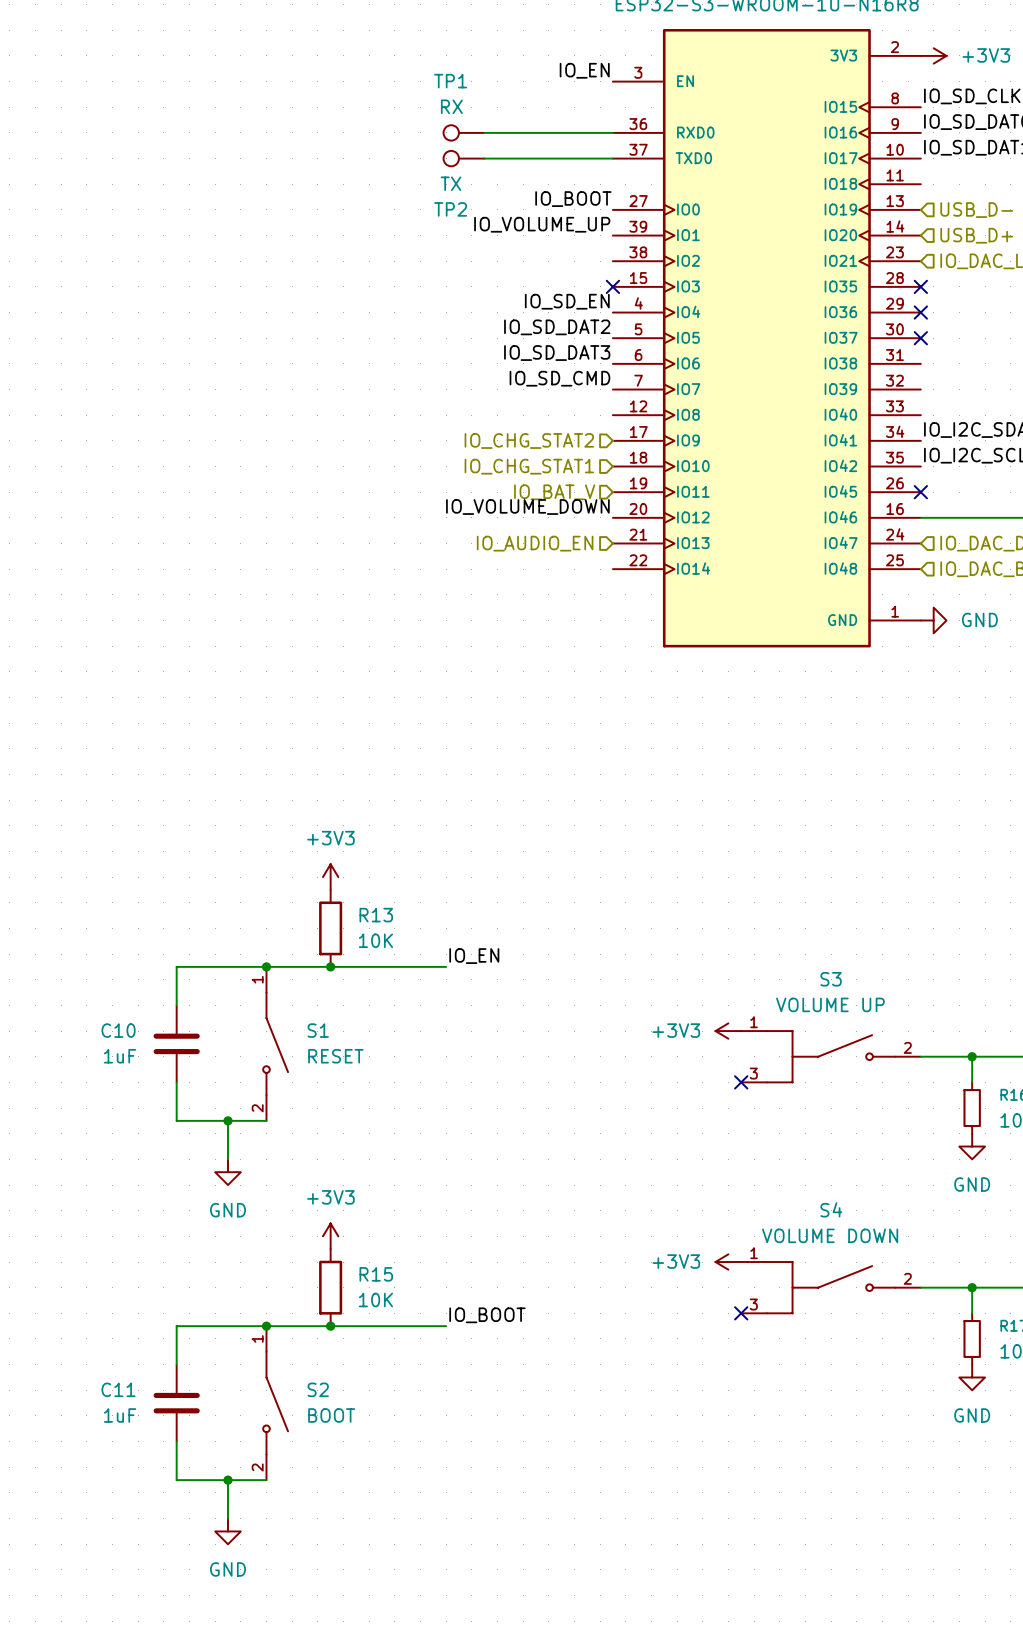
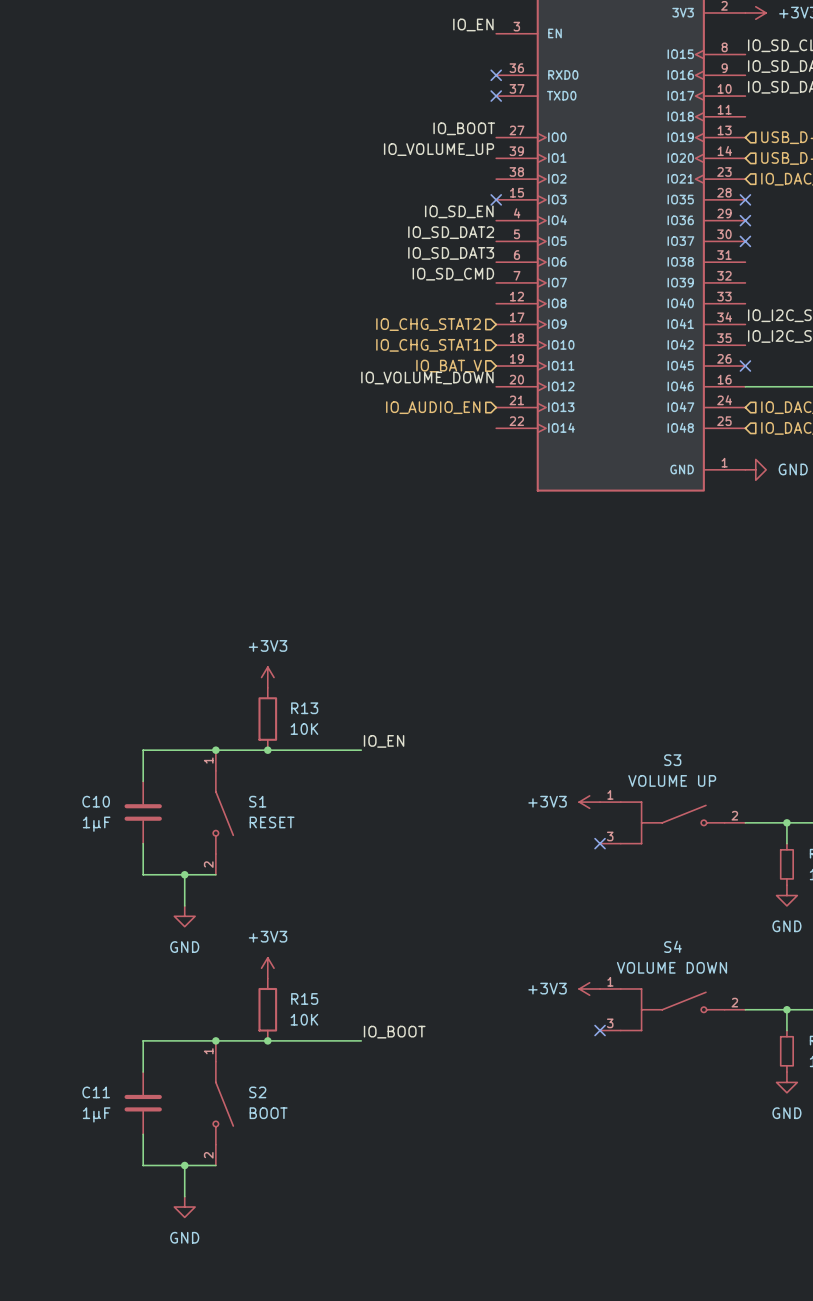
TP1: RX (464, 132) -> none
wire: (484, 132) (612, 132) -> none
no-connect mark: none -> (496, 75)
TP2: TX (464, 158) -> none
wire: (484, 158) (612, 158) -> none
no-connect mark: none -> (496, 96)
C10 value: 1uF (120, 1056) -> 1µF (96, 824)
C11 value: 1uF (120, 1415) -> 1µF (96, 1114)

